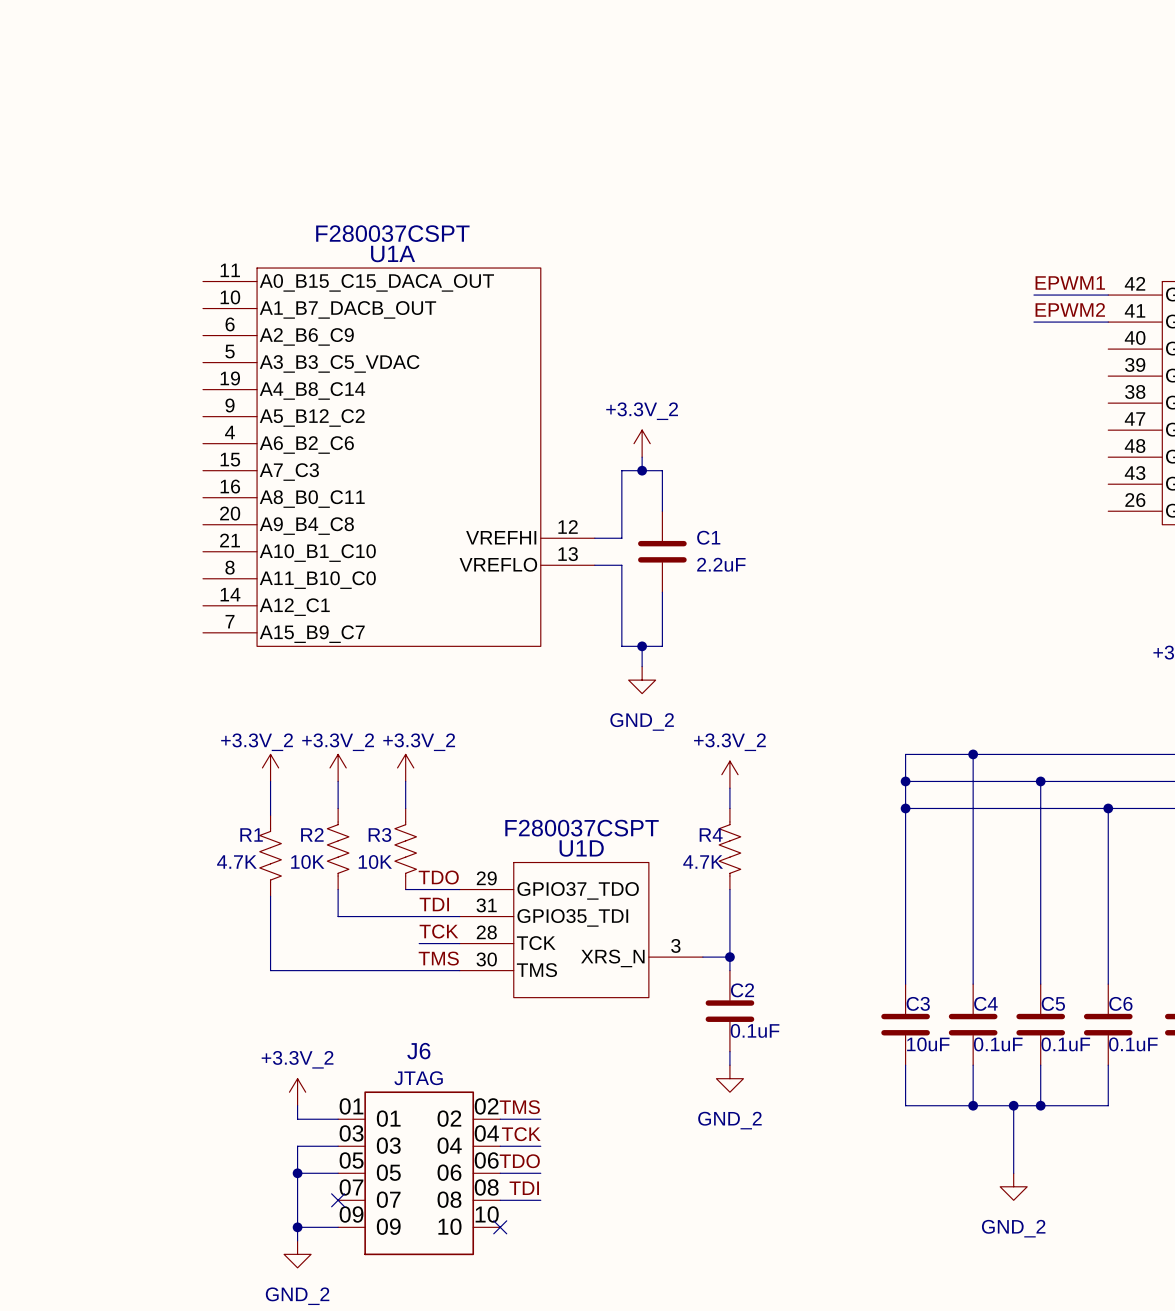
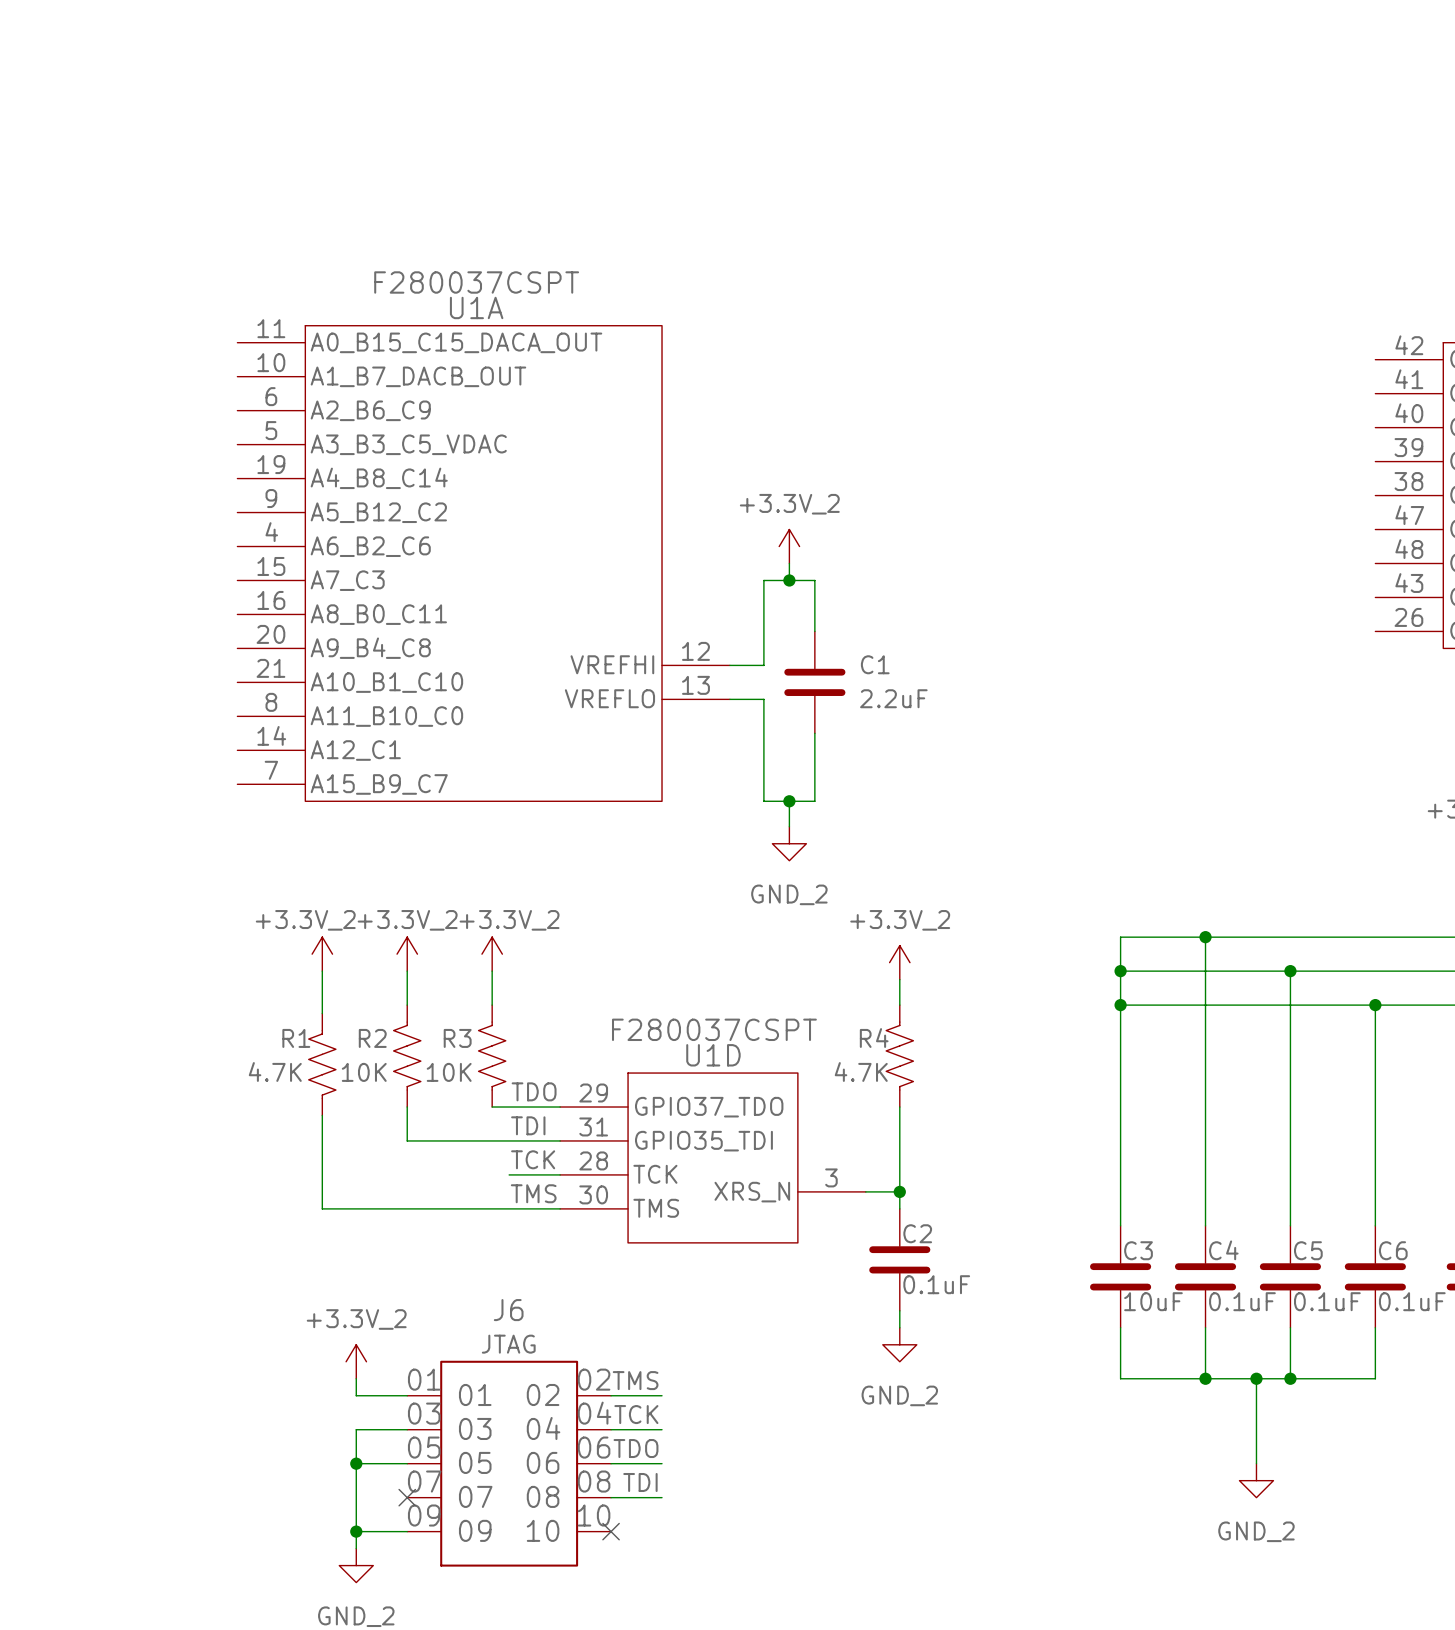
label: EPWM1 (1070, 282) -> none
wire: (1033, 295) (1108, 295) -> none
label: EPWM2 (1070, 309) -> none
wire: (1033, 322) (1108, 322) -> none

